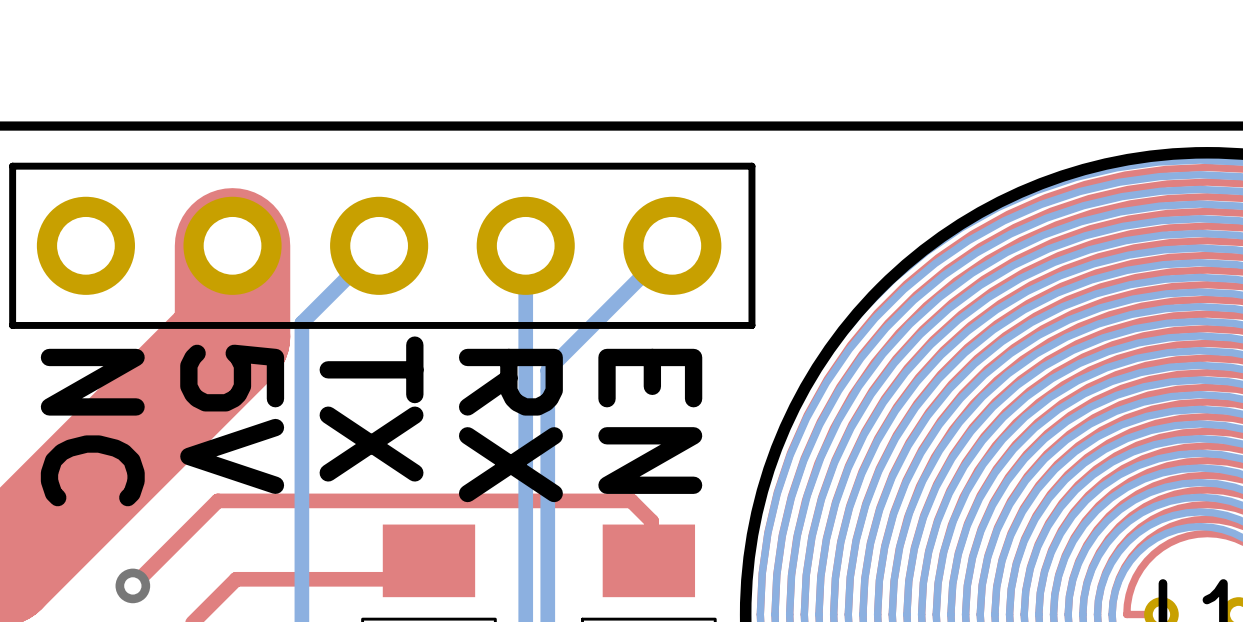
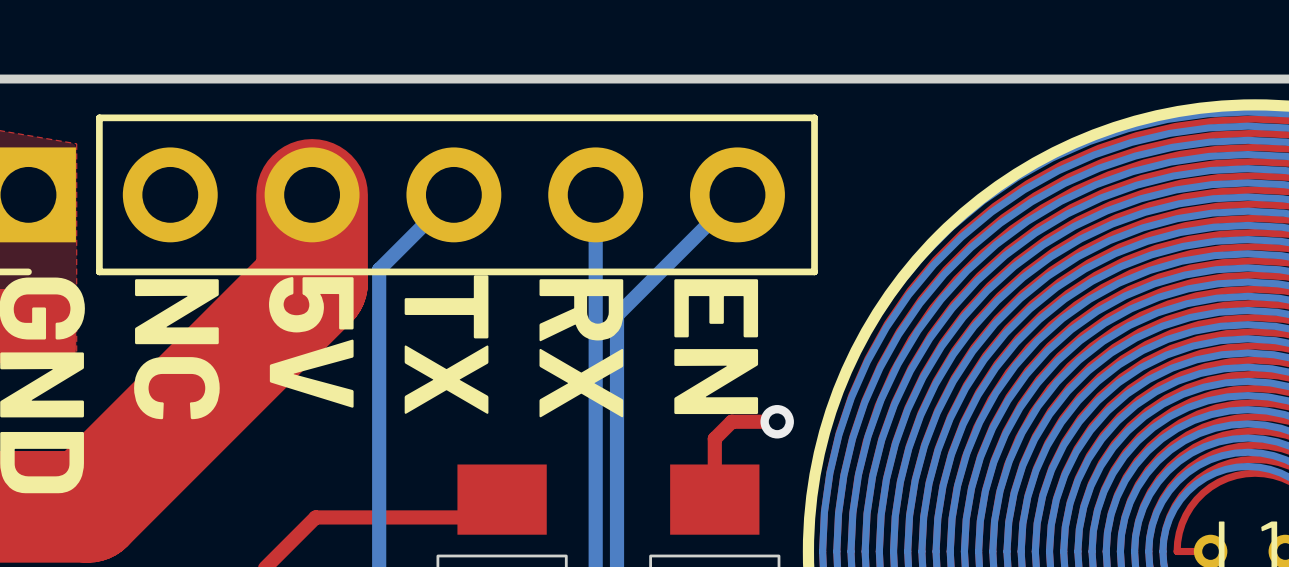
top track: none -> (777, 421) (731, 421) (714, 438) (714, 499)
via: none -> (777, 421)
top track: (651, 582) (651, 521) (631, 500) (217, 500) (132, 585) -> none
via: (132, 585) -> none

